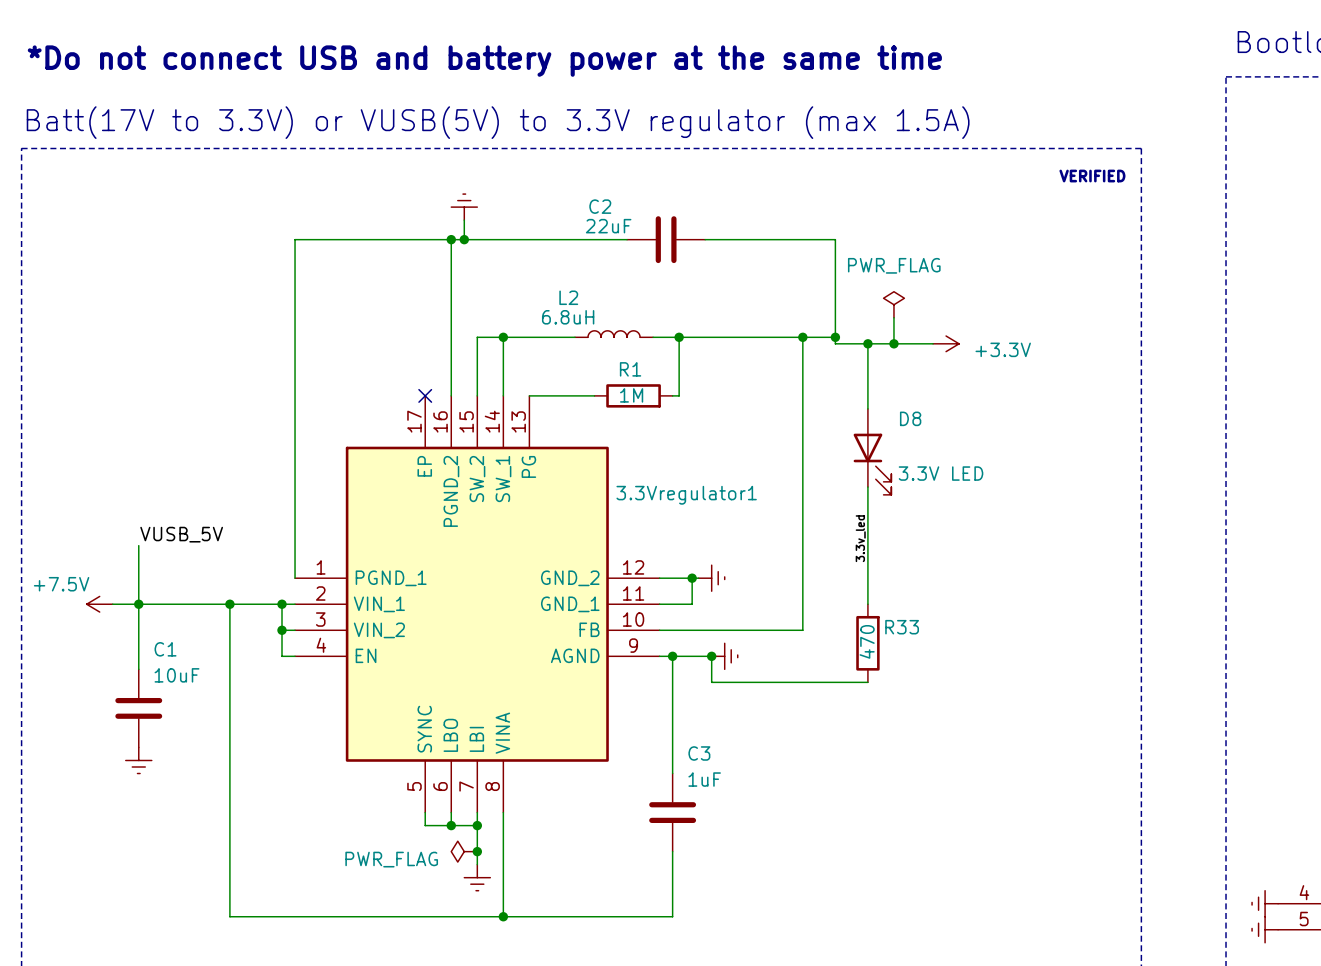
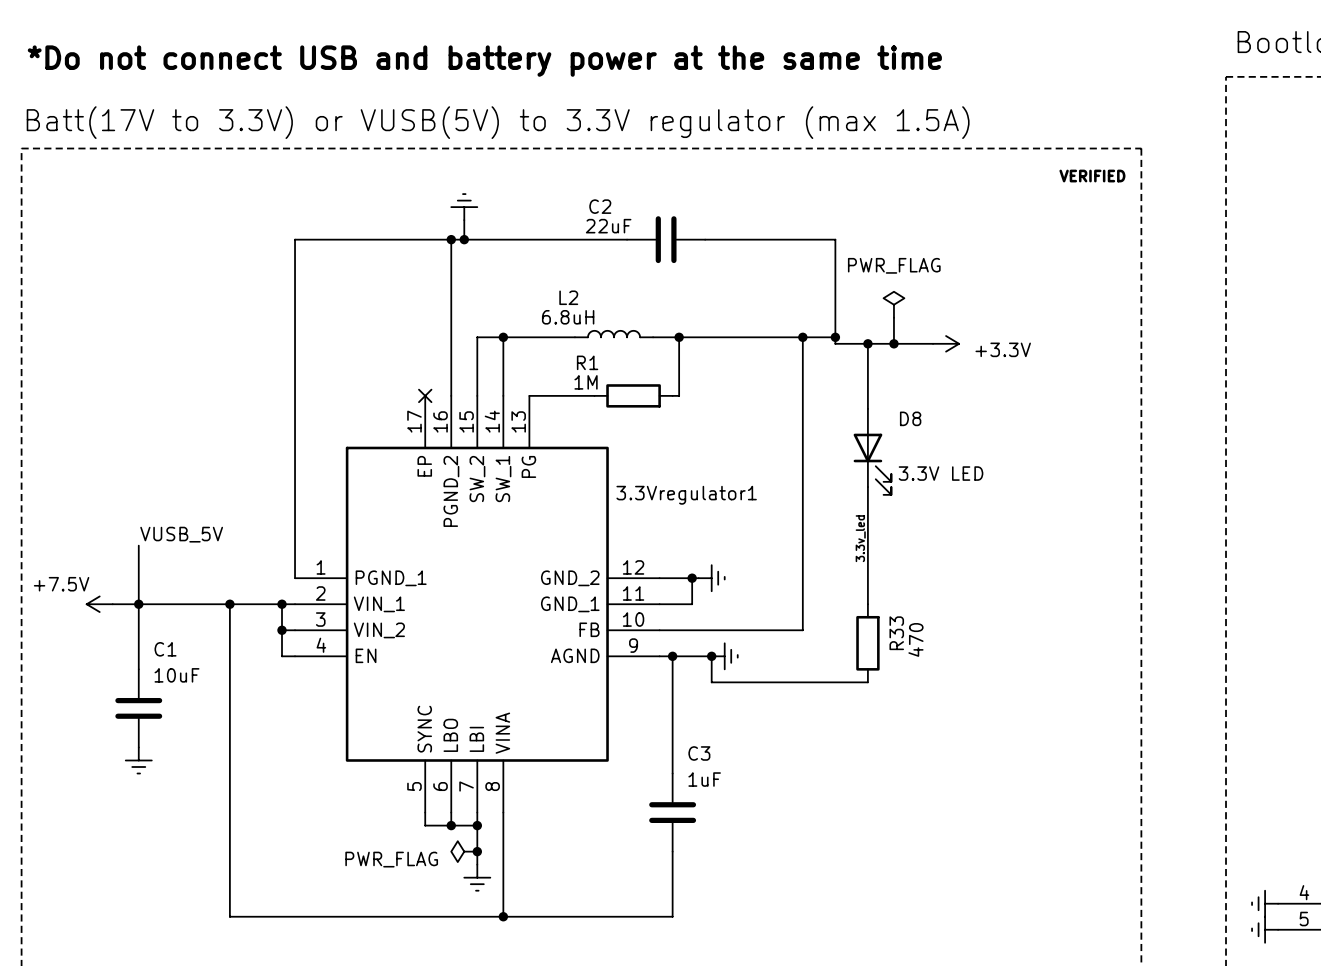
R1 name position: R1 (630, 369) -> R1 (587, 362)
R1 value position: 1M (631, 395) -> 1M (586, 382)
R33 name rotation: 0° (902, 627) -> 90° counterclockwise (896, 633)
R33 value position: 470 (867, 641) -> 470 (915, 639)

